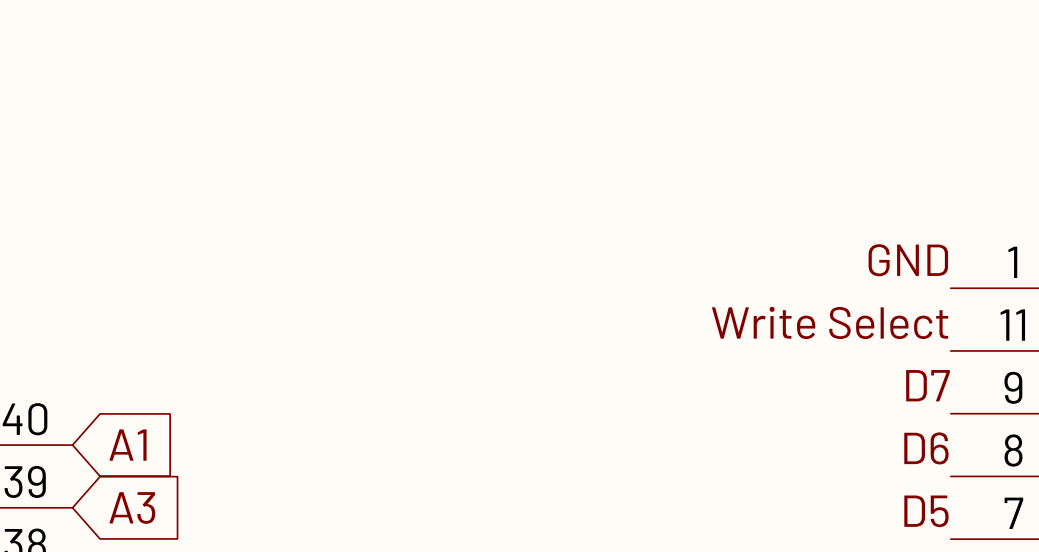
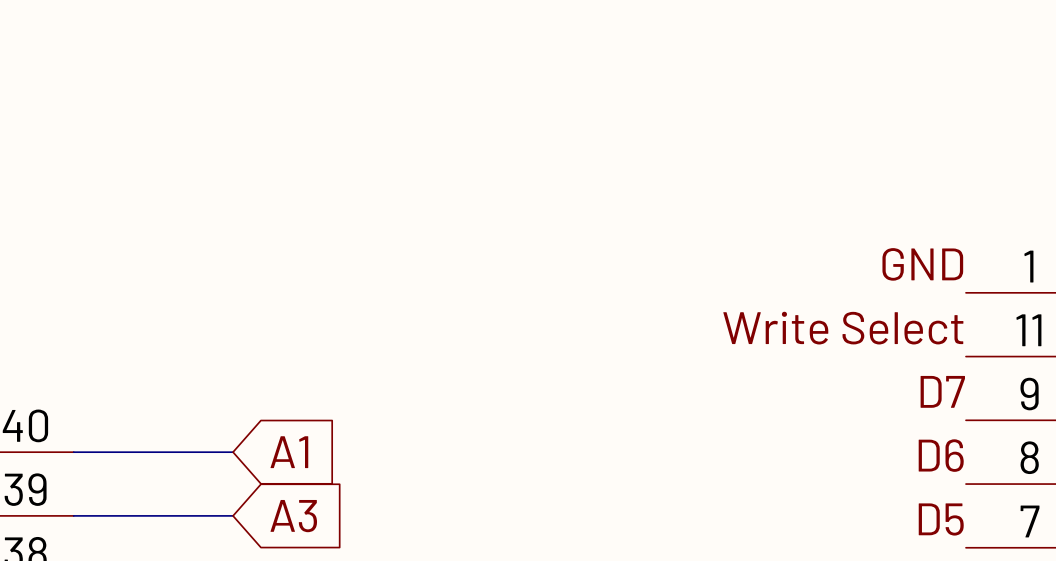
wire: none -> (73, 452) (233, 452)
global label position: A1 (127, 445) -> A1 (289, 452)
wire: none -> (73, 515) (233, 515)
global label position: A3 (132, 507) -> A3 (293, 516)

